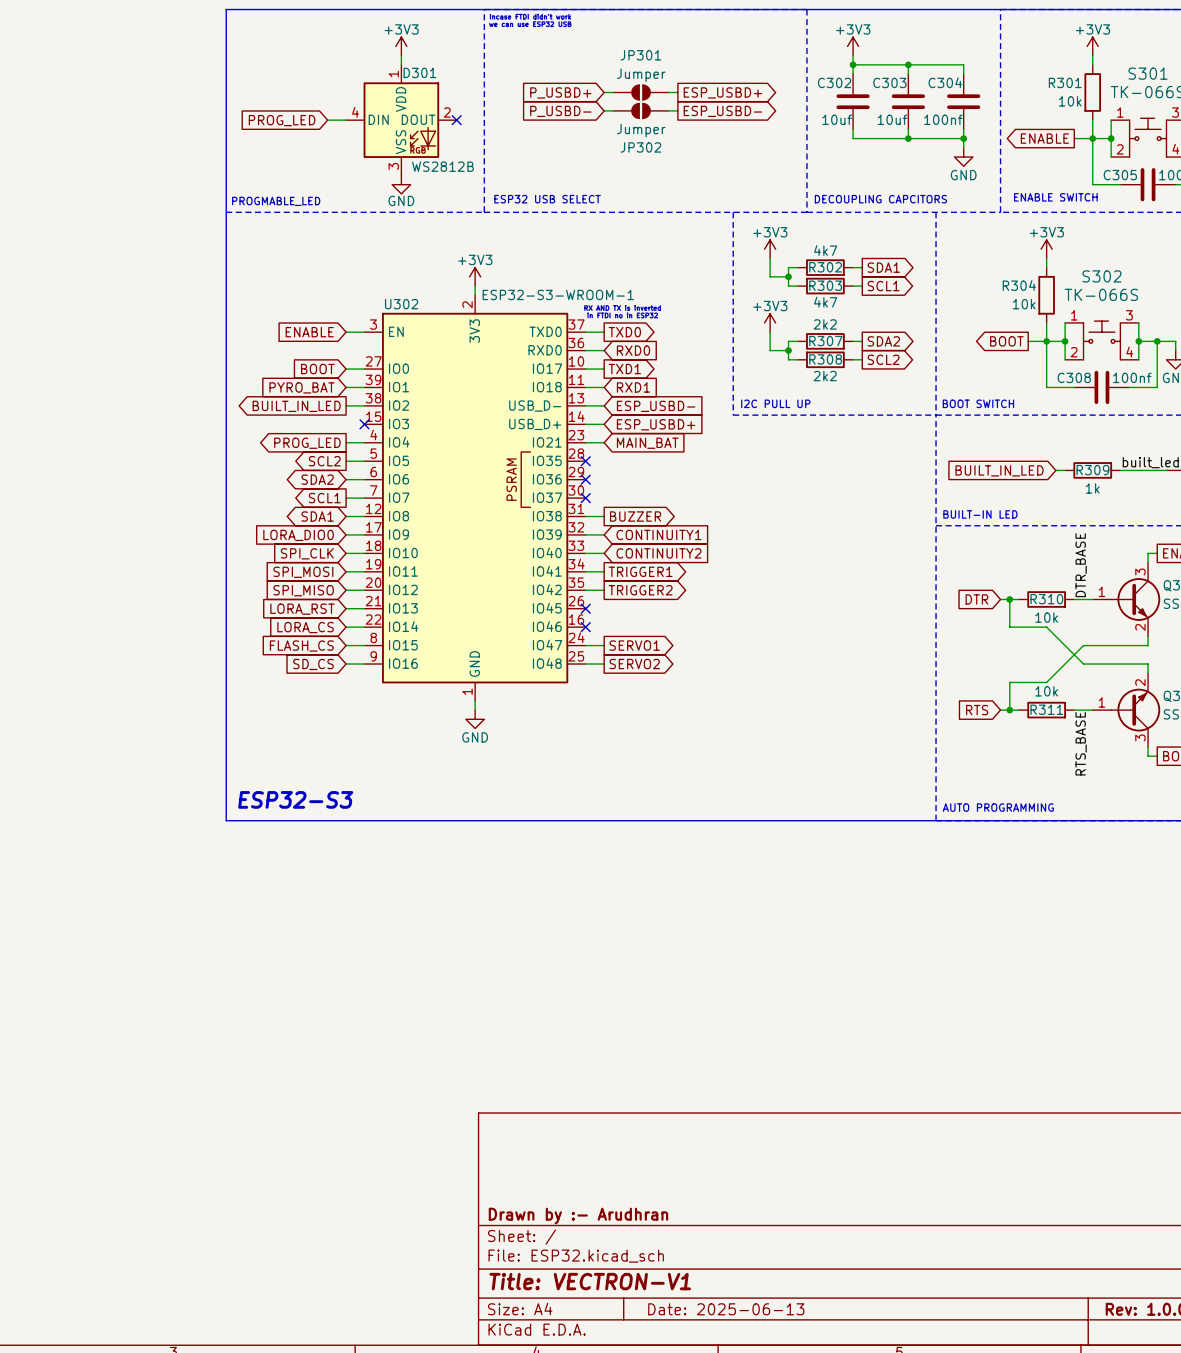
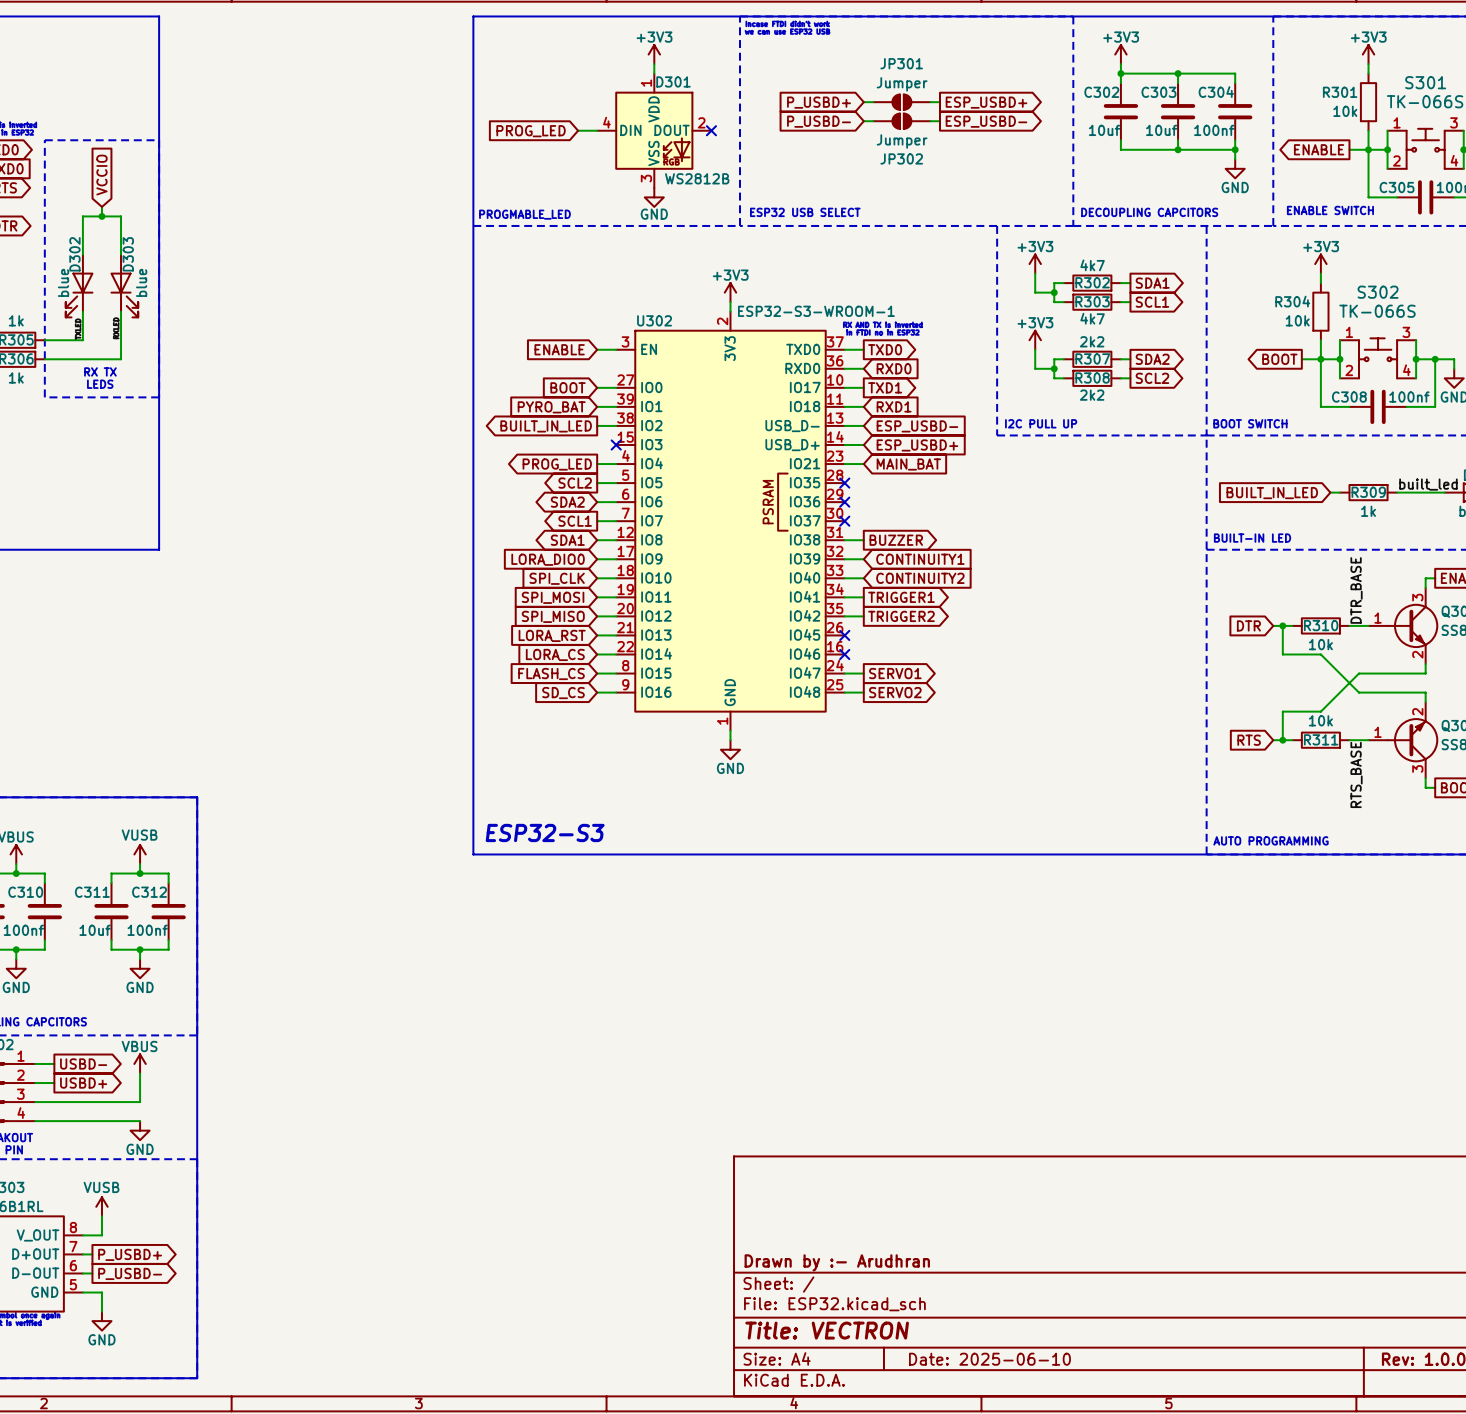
title block: Title: VECTRON-V1 (590, 1281) -> Title: VECTRON (827, 1330)
title block: Date: 2025-06-13 (726, 1309) -> Date: 2025-06-10 (989, 1359)

